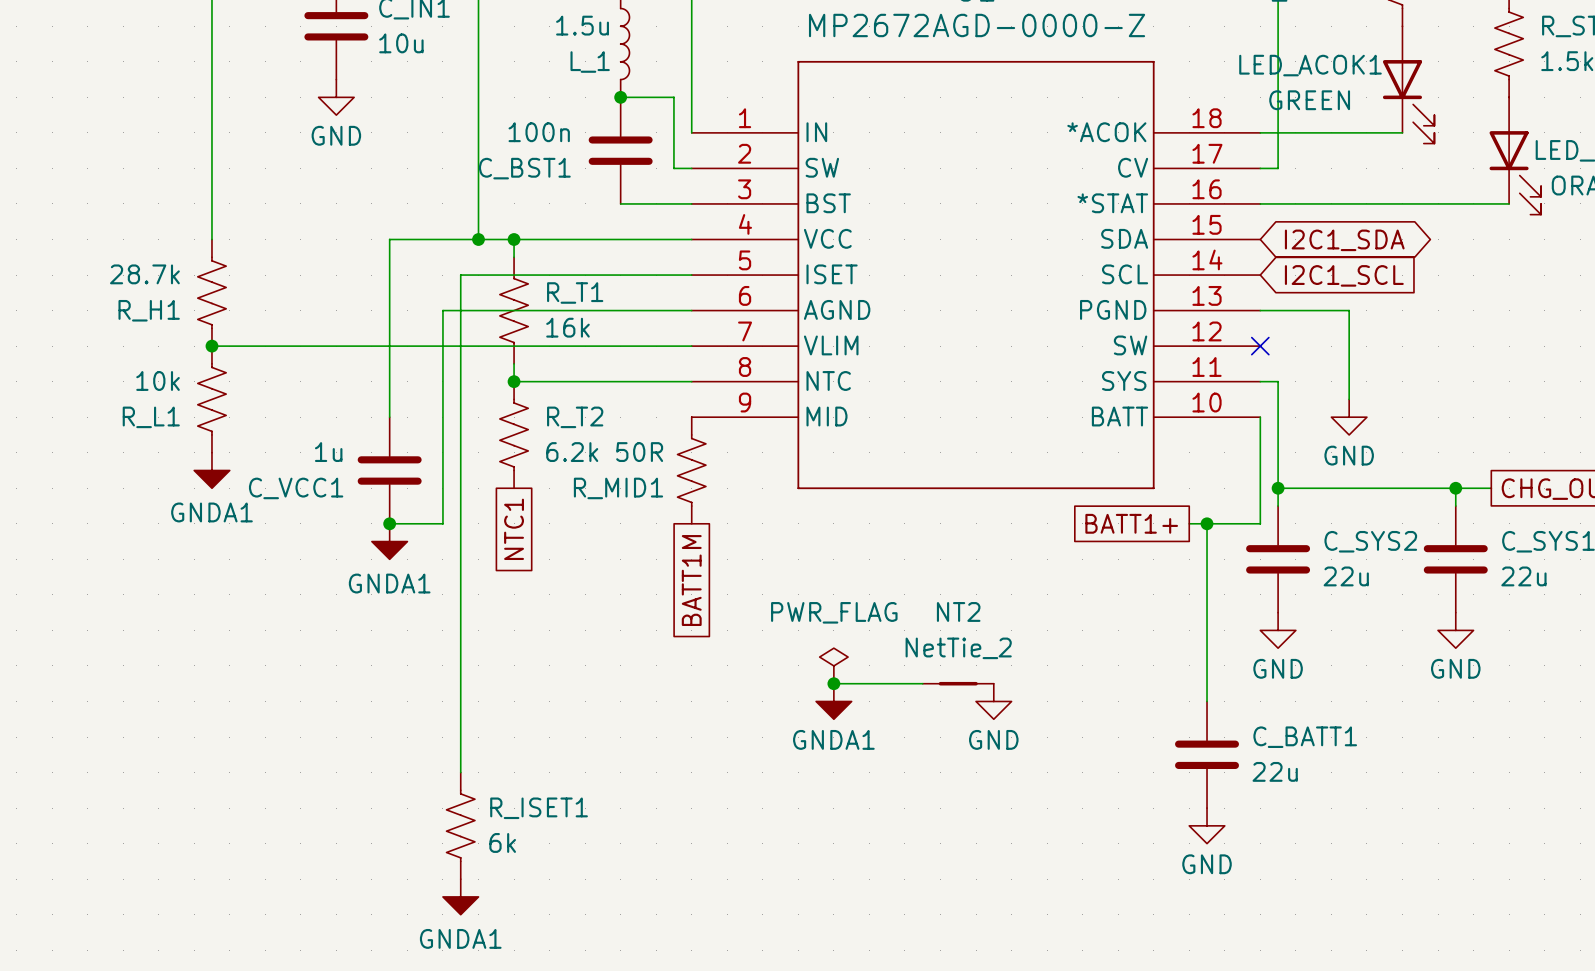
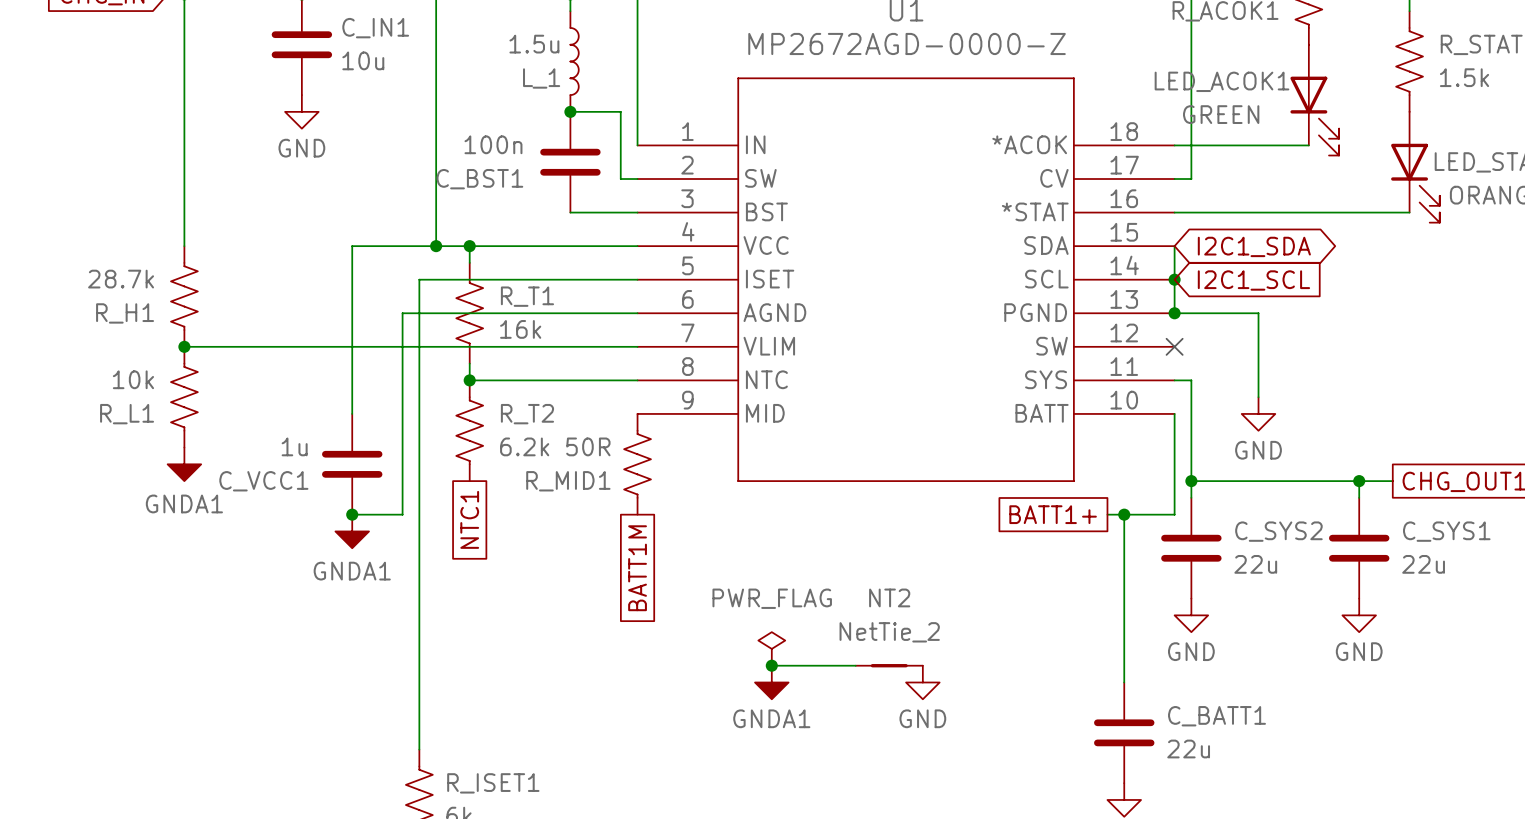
wire: none -> (1174, 246) (1174, 313)
junction: none -> (1174, 279)
junction: none -> (1174, 313)

